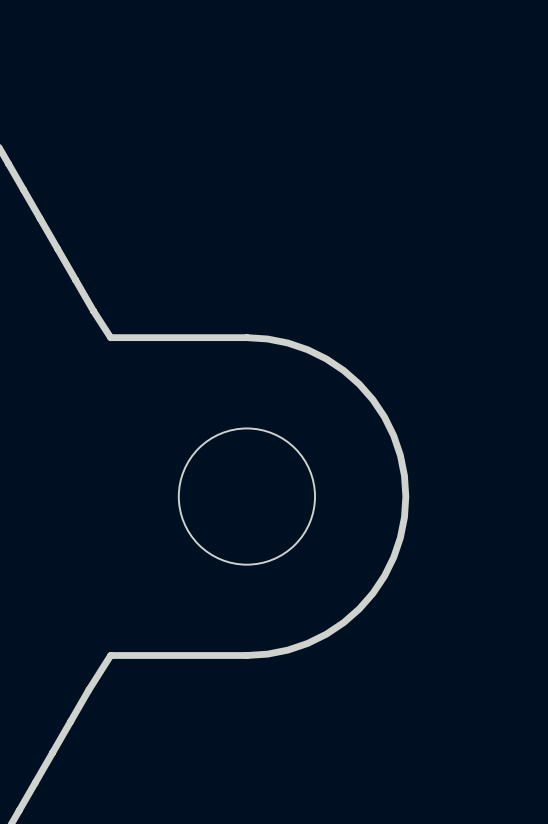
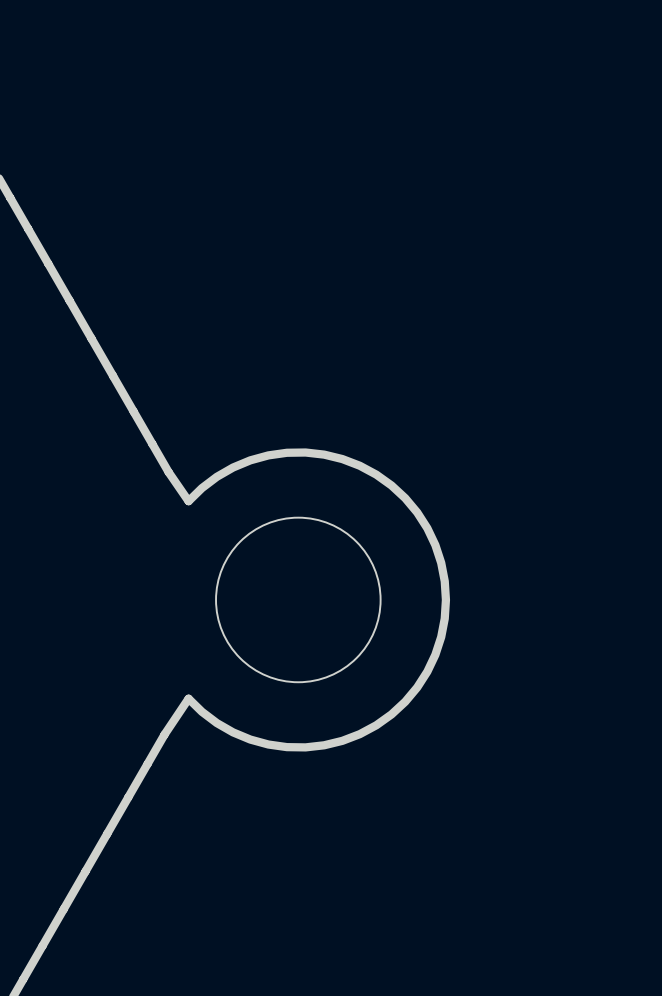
board edge: (93, 311) (110, 337) (267, 339) (288, 343) (326, 358) (359, 384) (384, 417) (400, 455) (405, 496) (400, 537) (384, 576) (359, 608) (326, 634) (288, 650) (267, 654) (110, 655) (88, 690) -> (113, 375) (168, 472) (188, 501) (216, 476) (233, 467) (250, 460) (286, 452) (305, 452) (342, 459) (376, 474) (405, 498) (427, 528) (441, 562) (445, 599) (441, 636) (435, 654) (417, 687) (391, 714) (359, 734) (324, 745) (305, 747) (268, 744) (250, 739) (216, 723) (188, 698) (164, 734) (107, 833)

